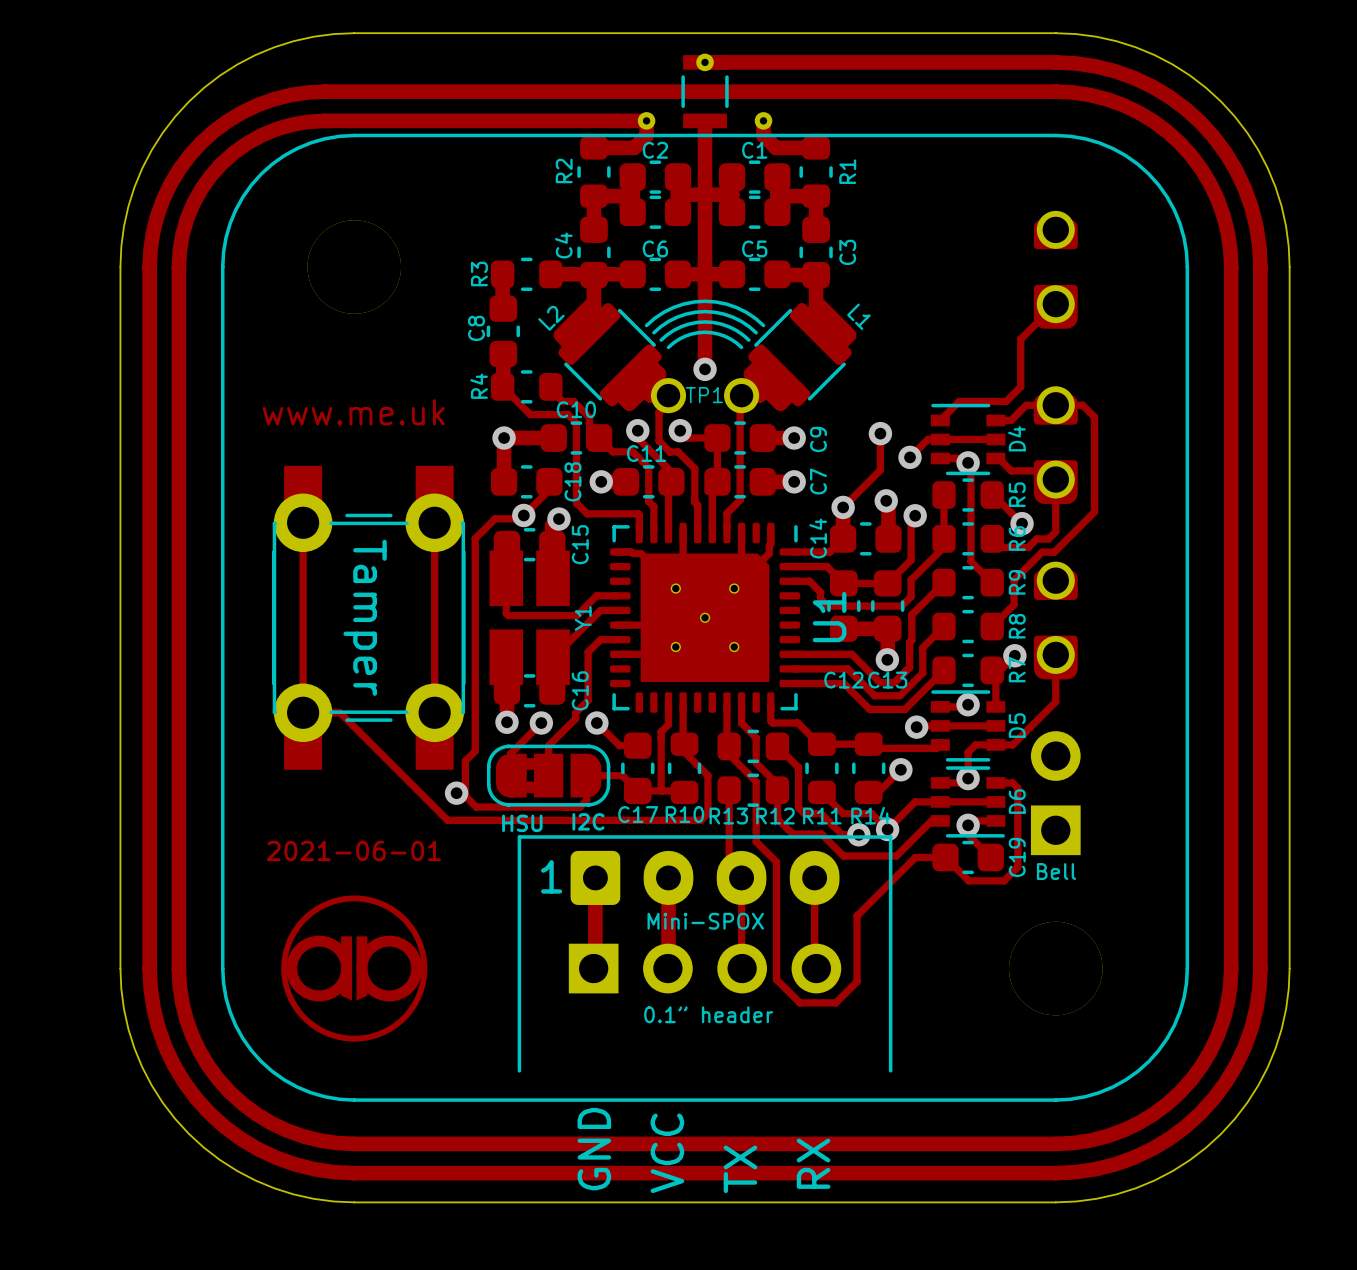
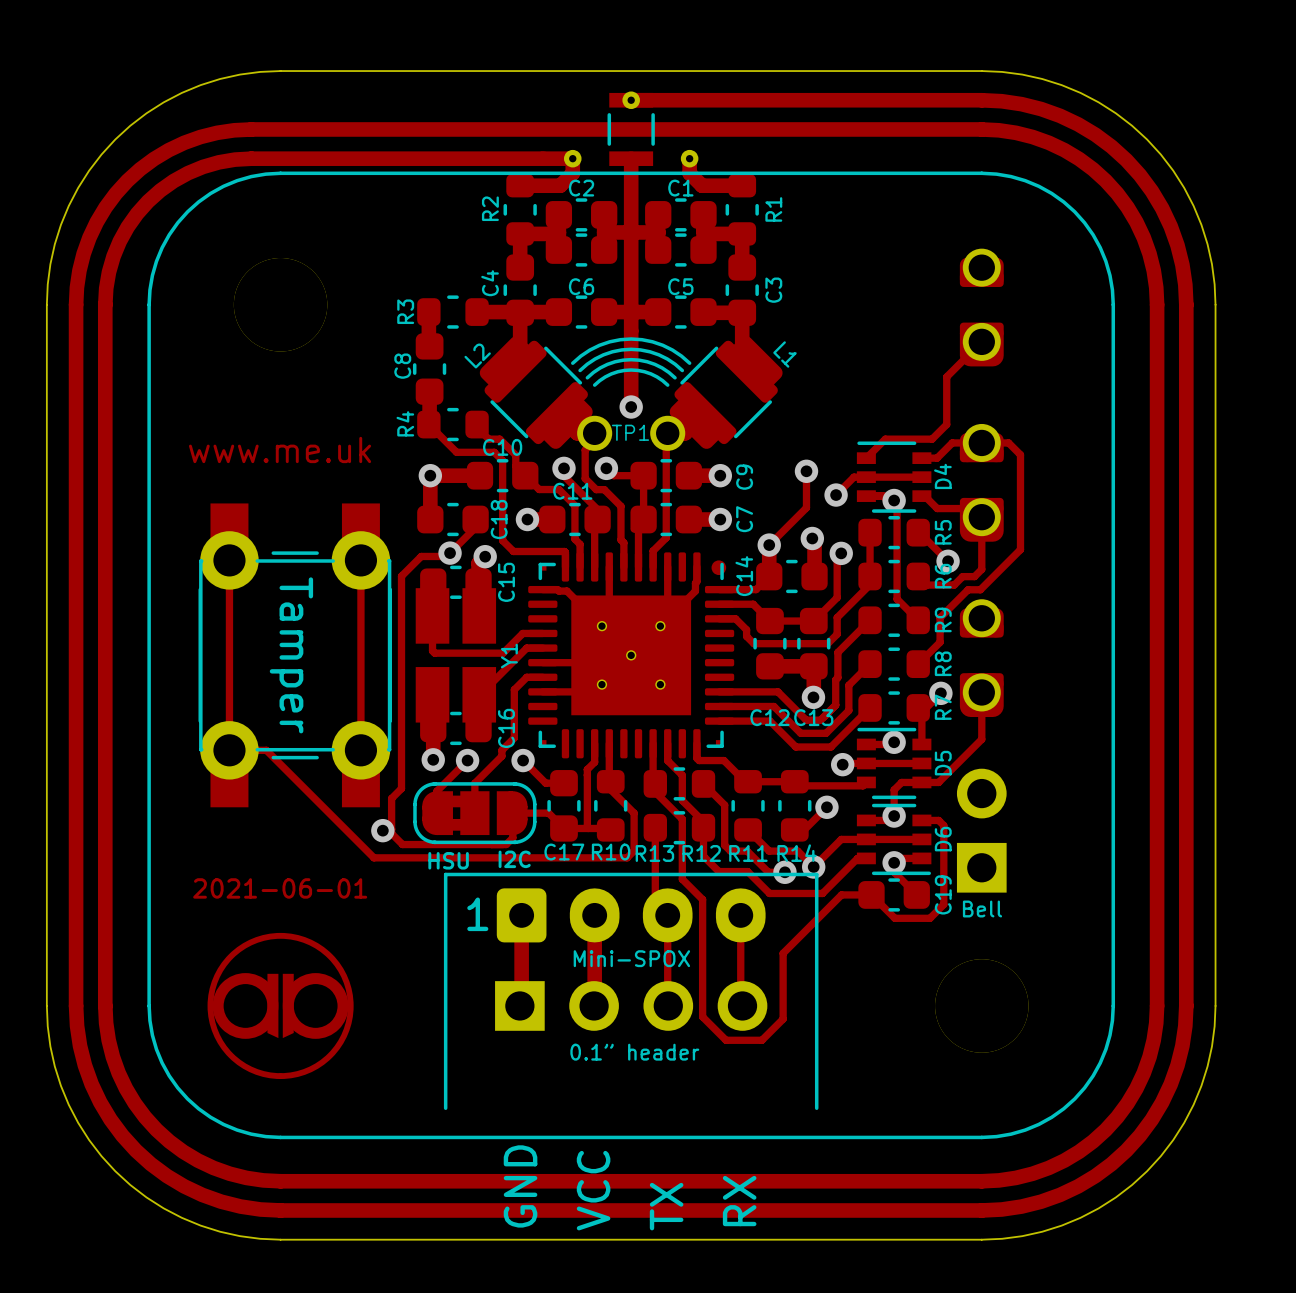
U1: (705, 617) -> none
part: none -> (631, 655)

